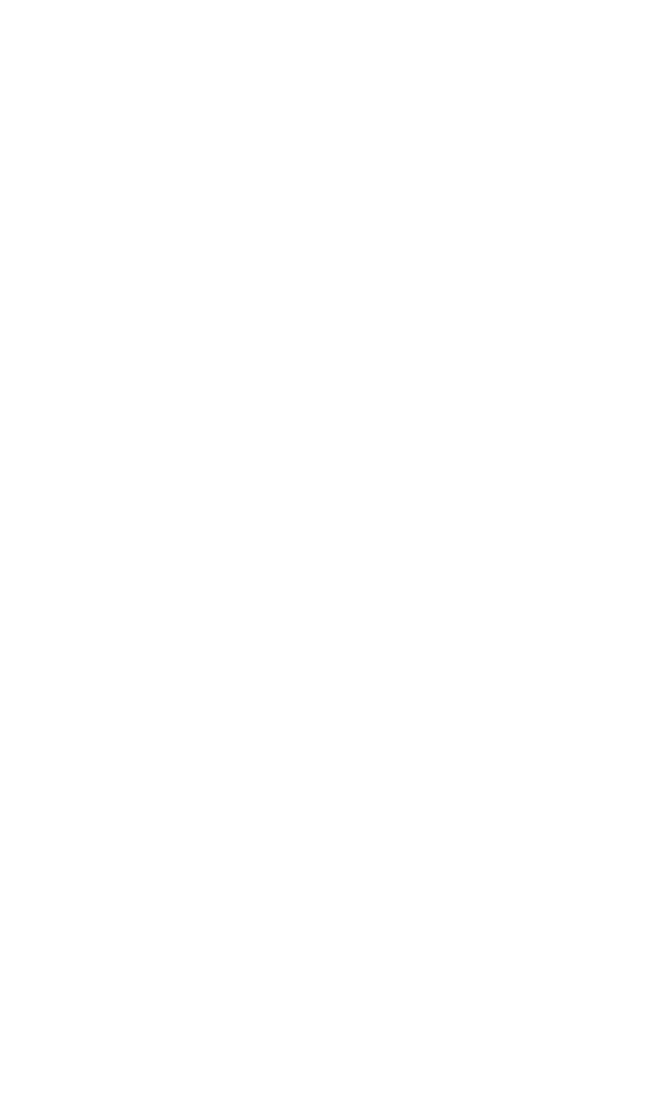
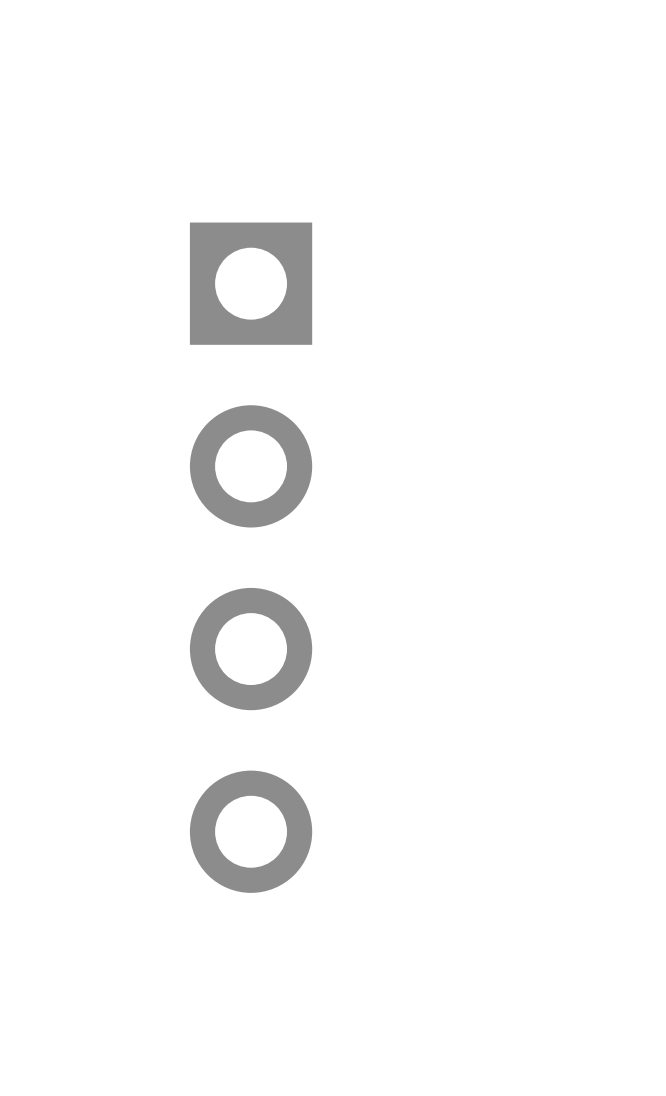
part: none -> (251, 557)

